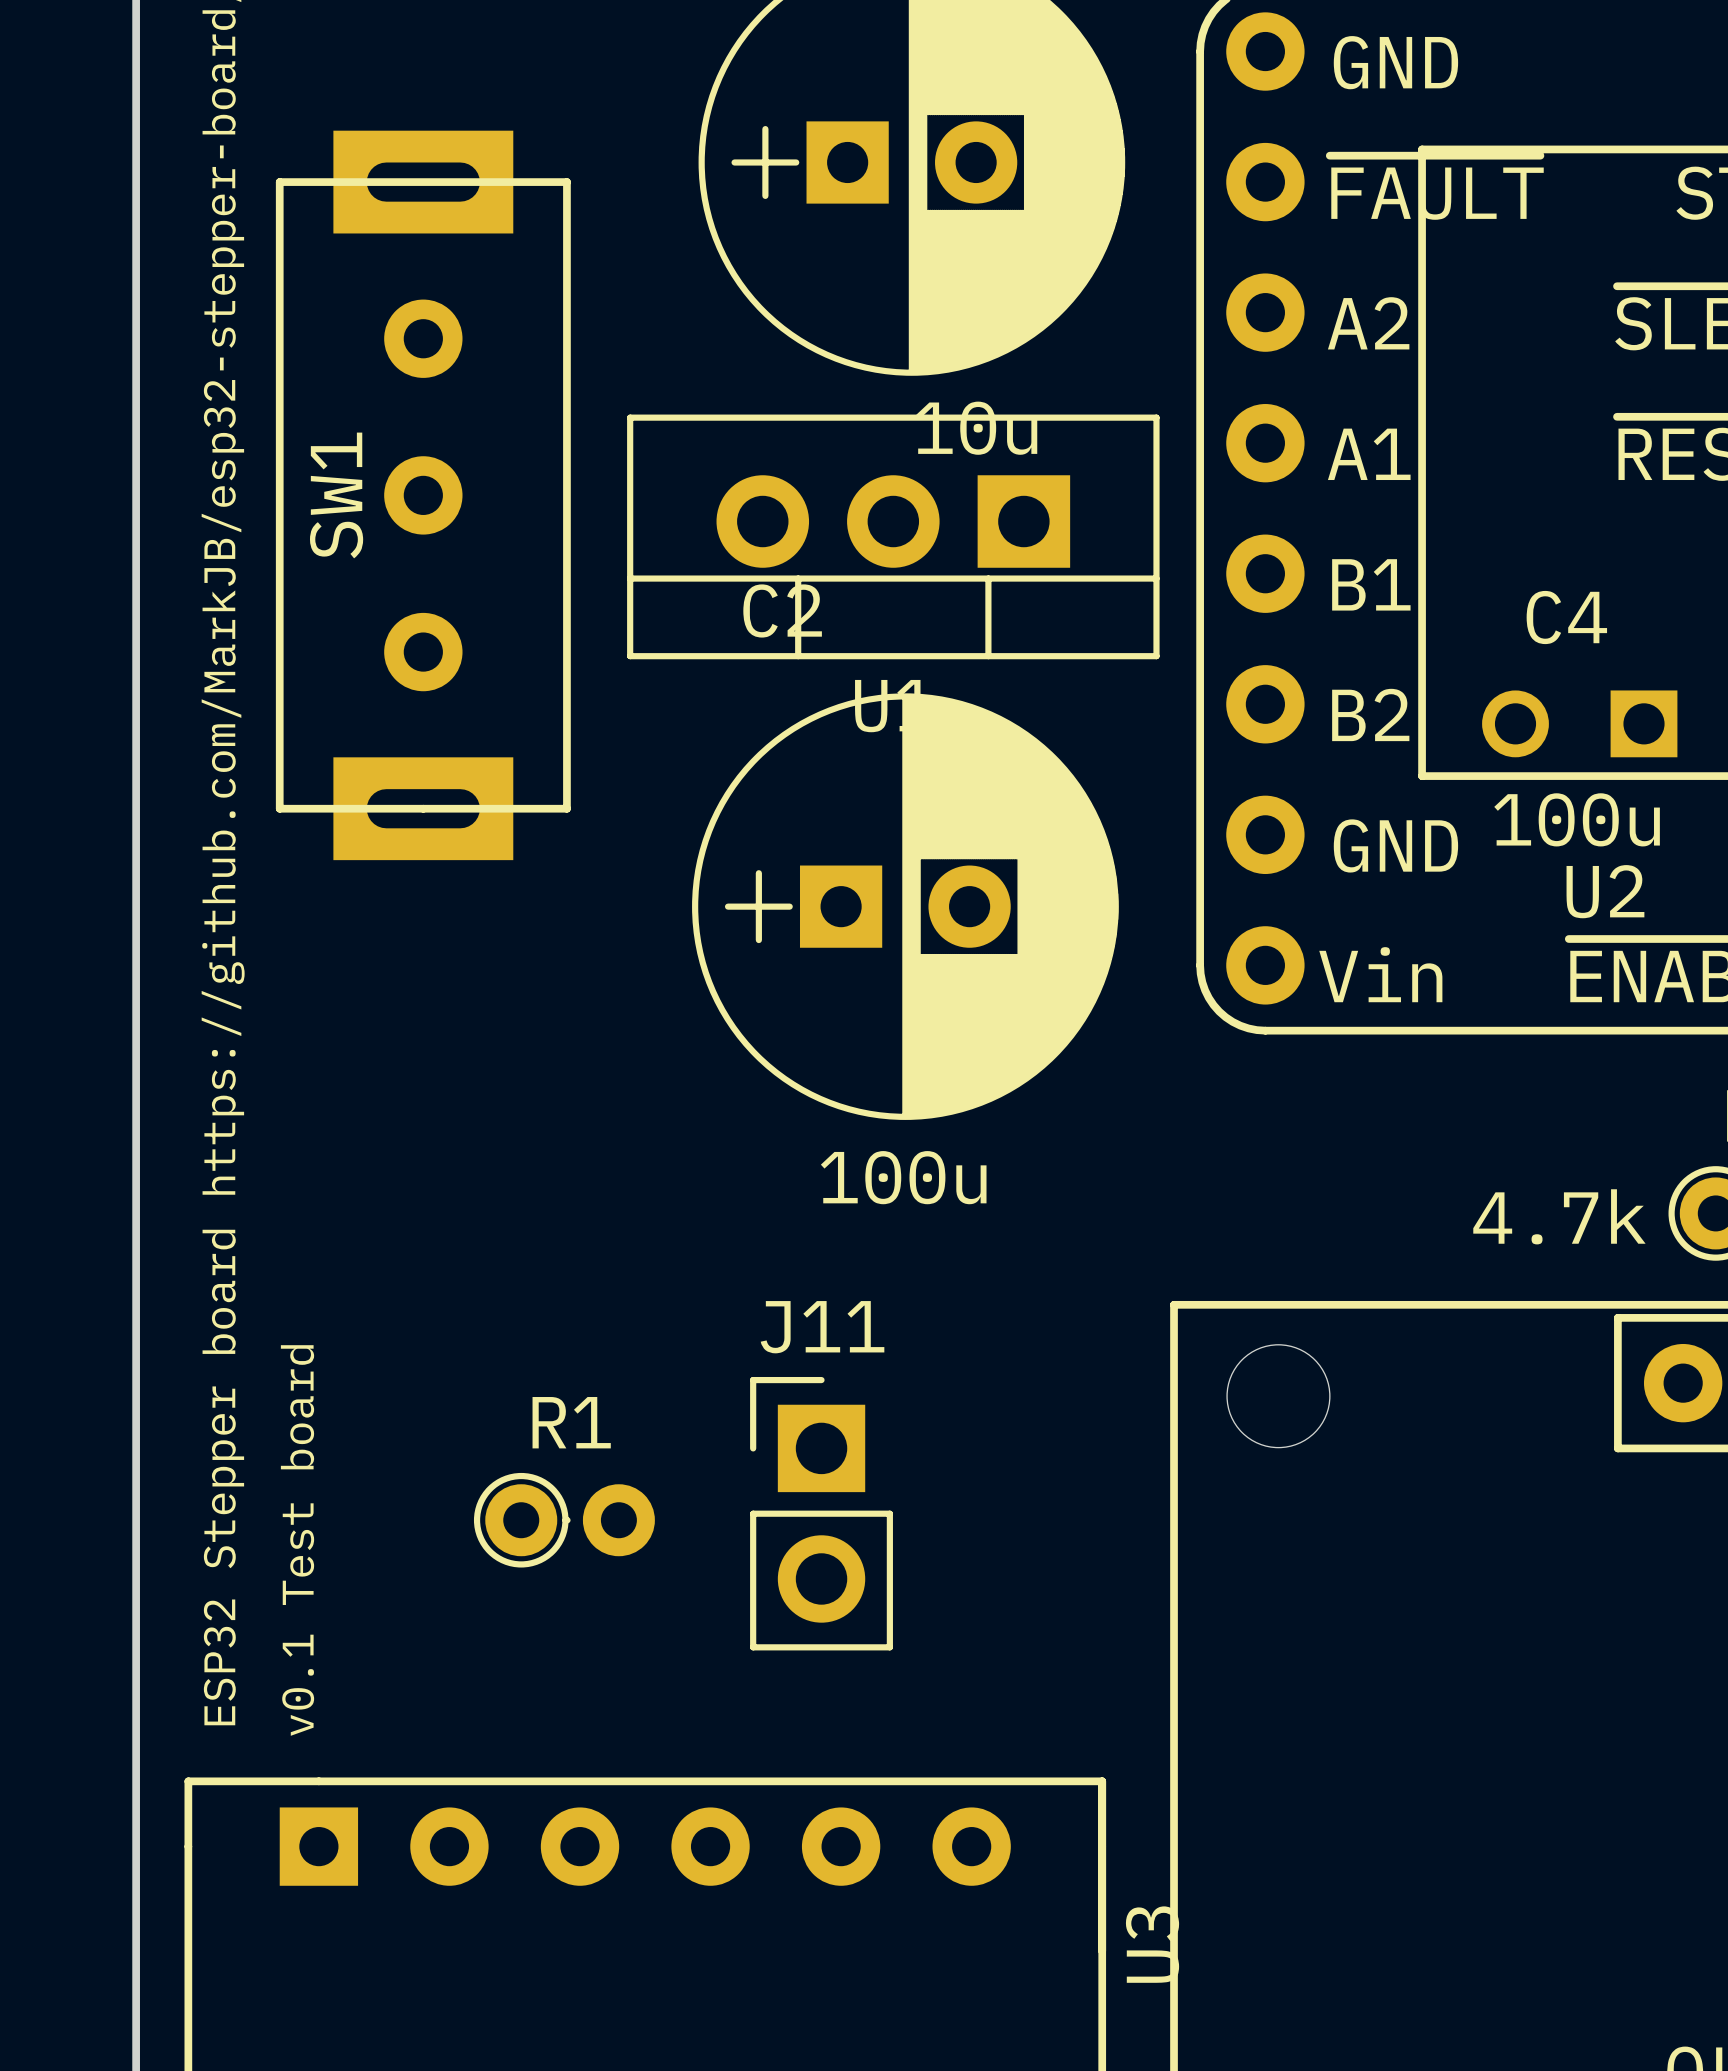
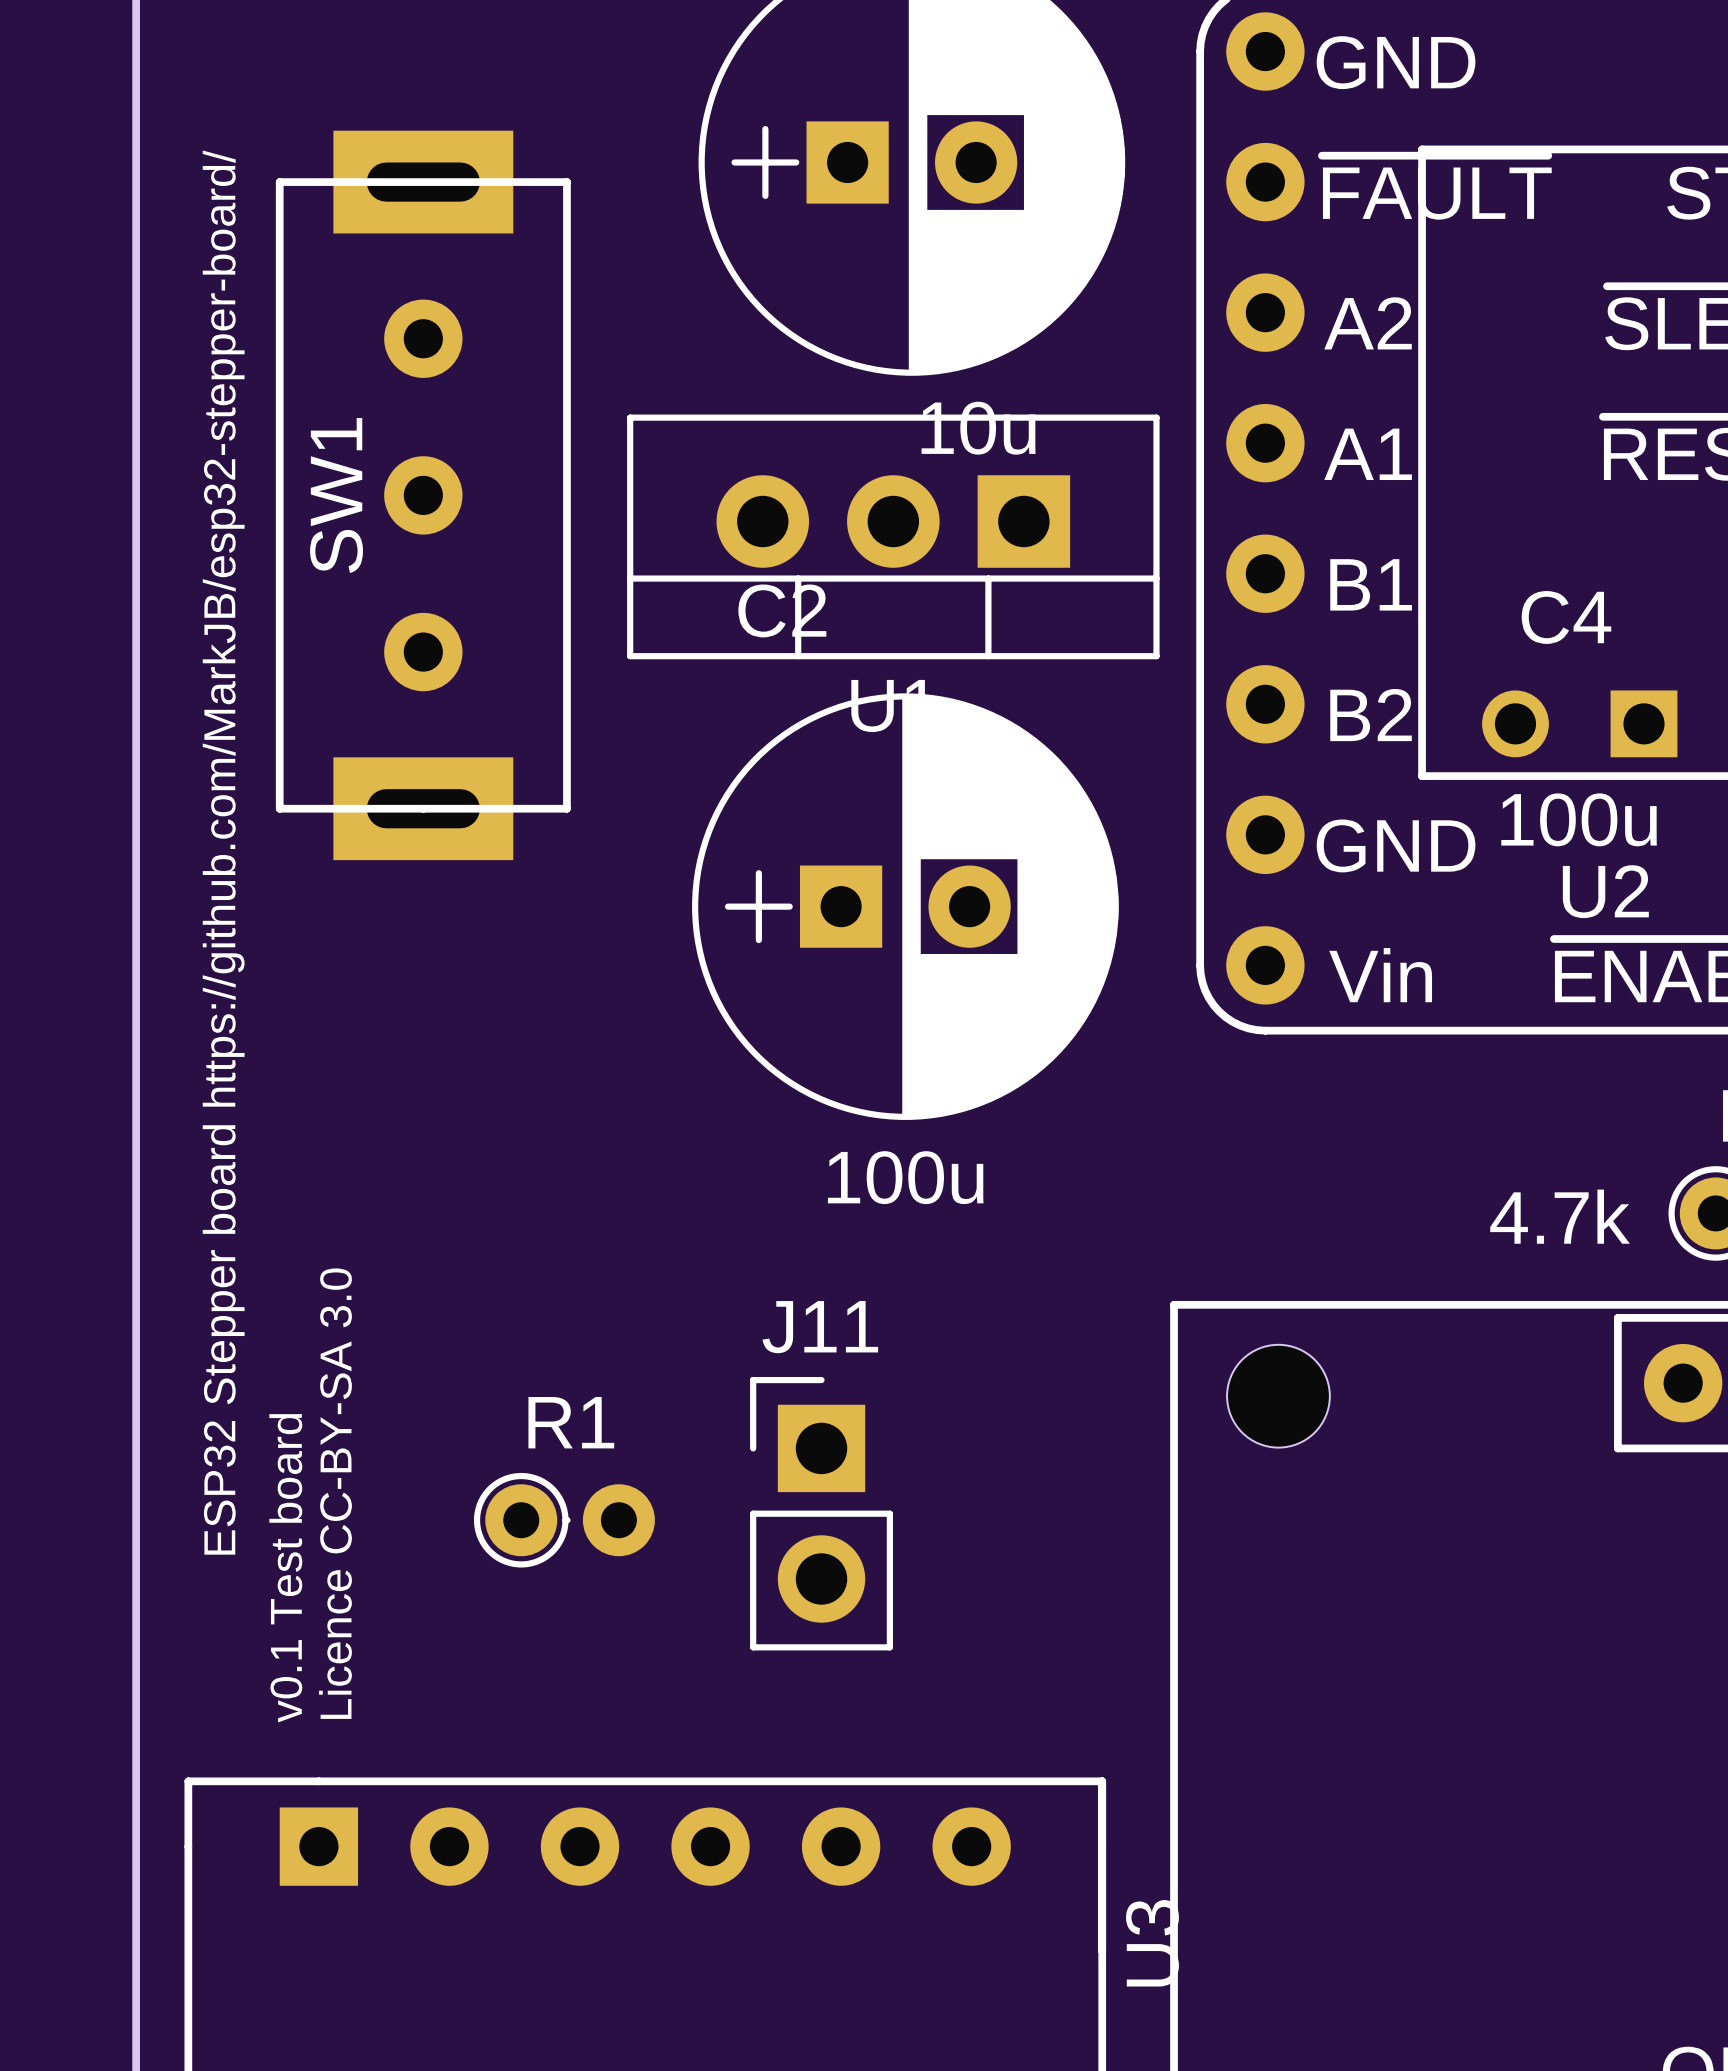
text: none -> Licence CC-BY-SA 3.0 (335, 1493)
text position: v0.1 Test board (297, 1540) -> v0.1 Test board (285, 1568)

